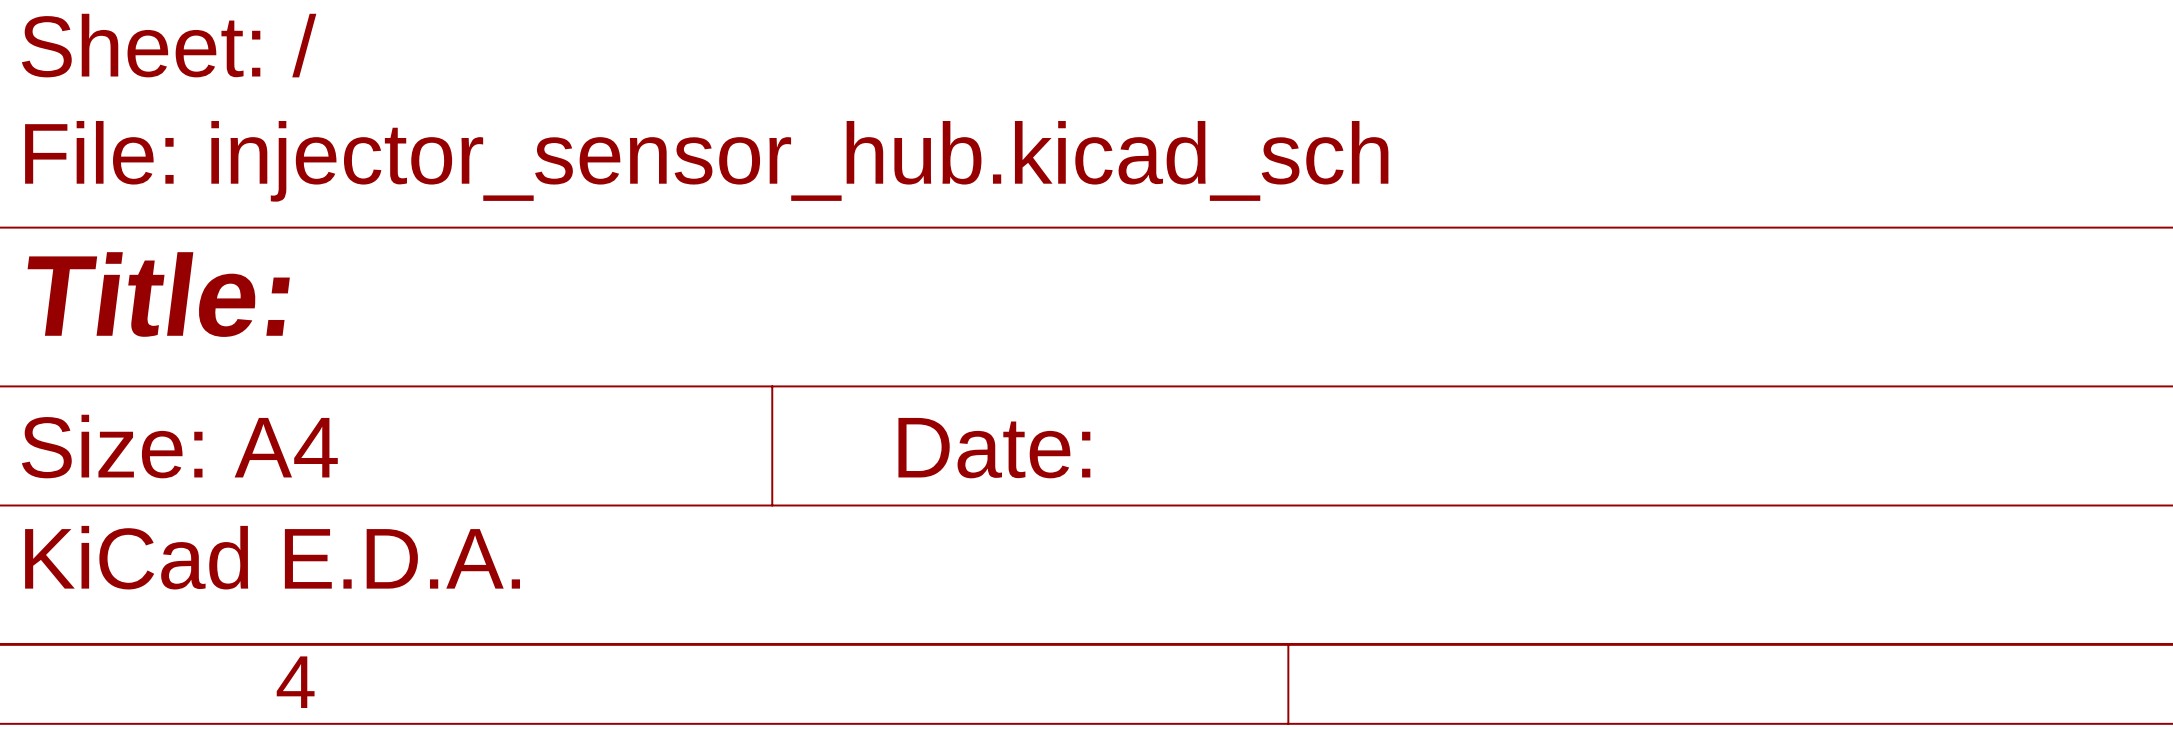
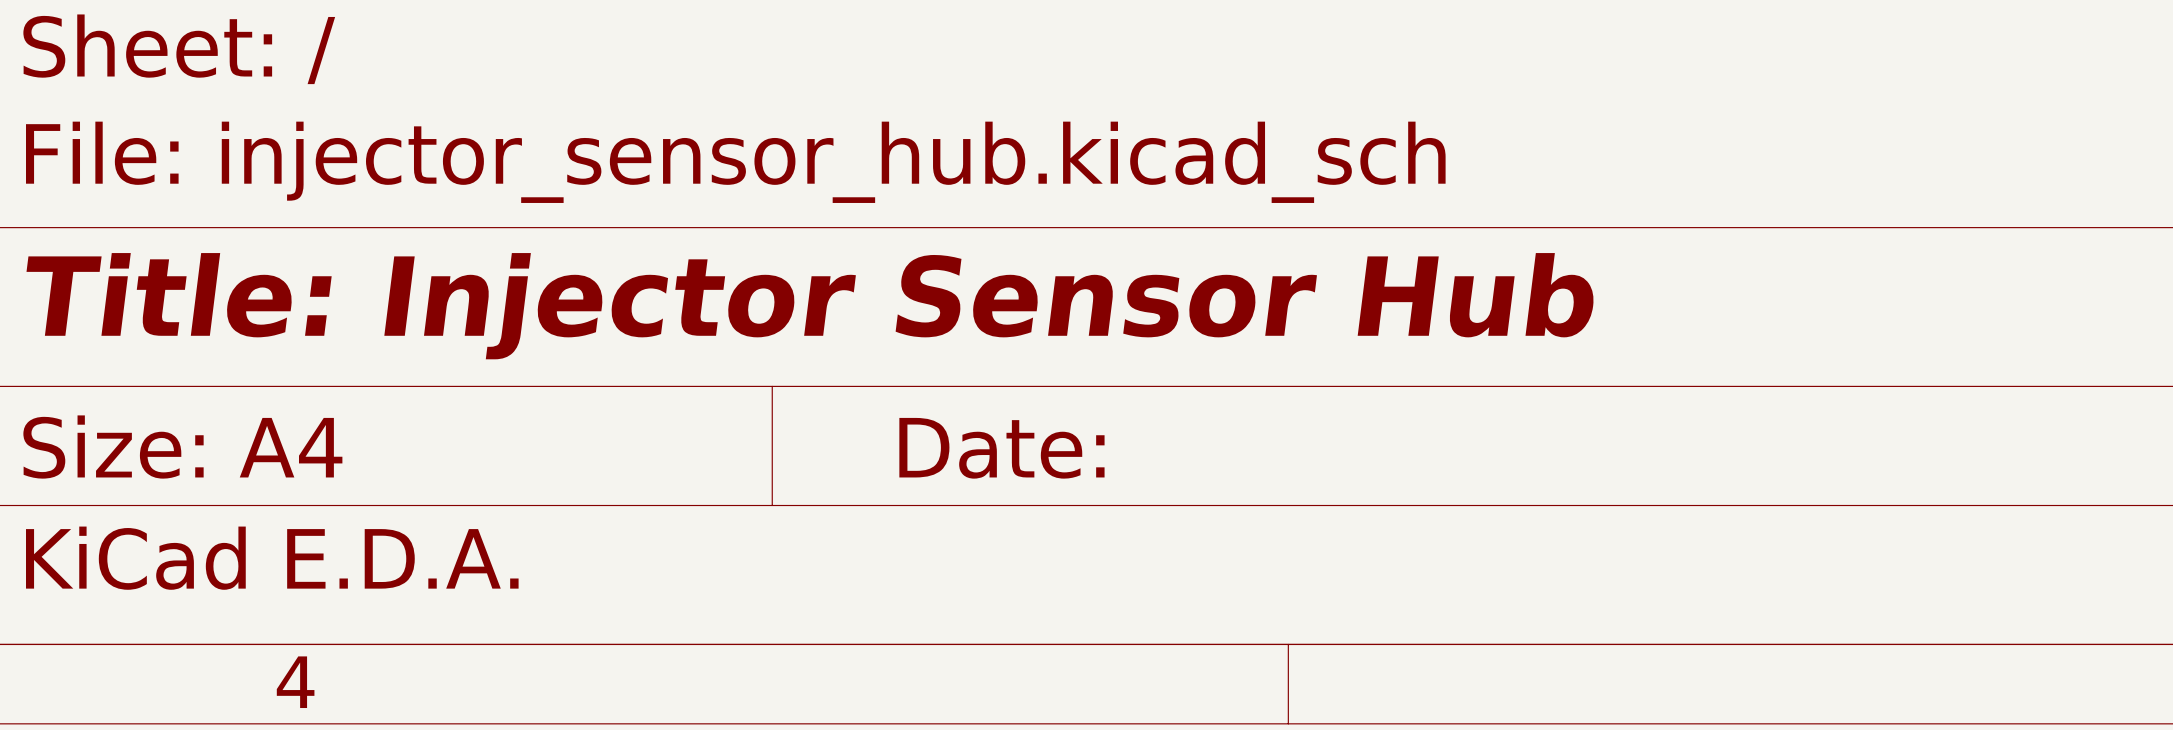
title block: Title: (158, 294) -> Title: Injector Sensor Hub (810, 306)

